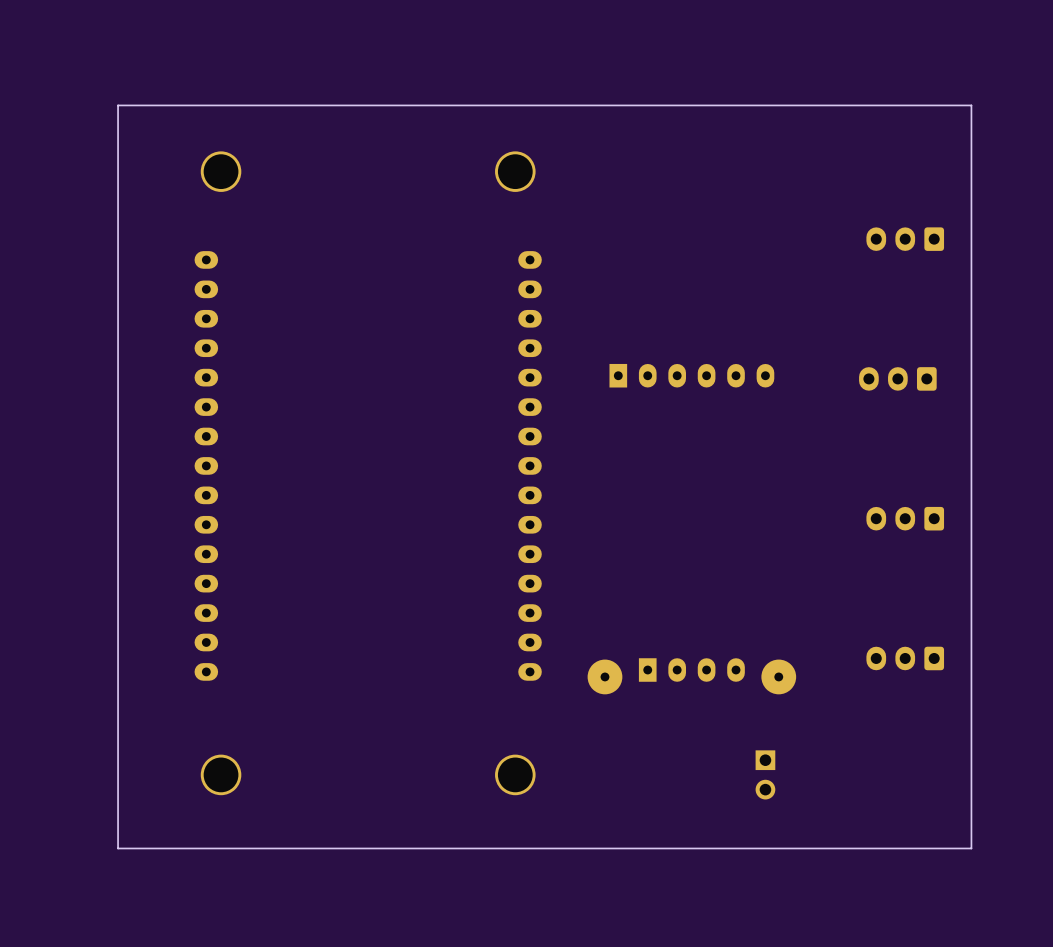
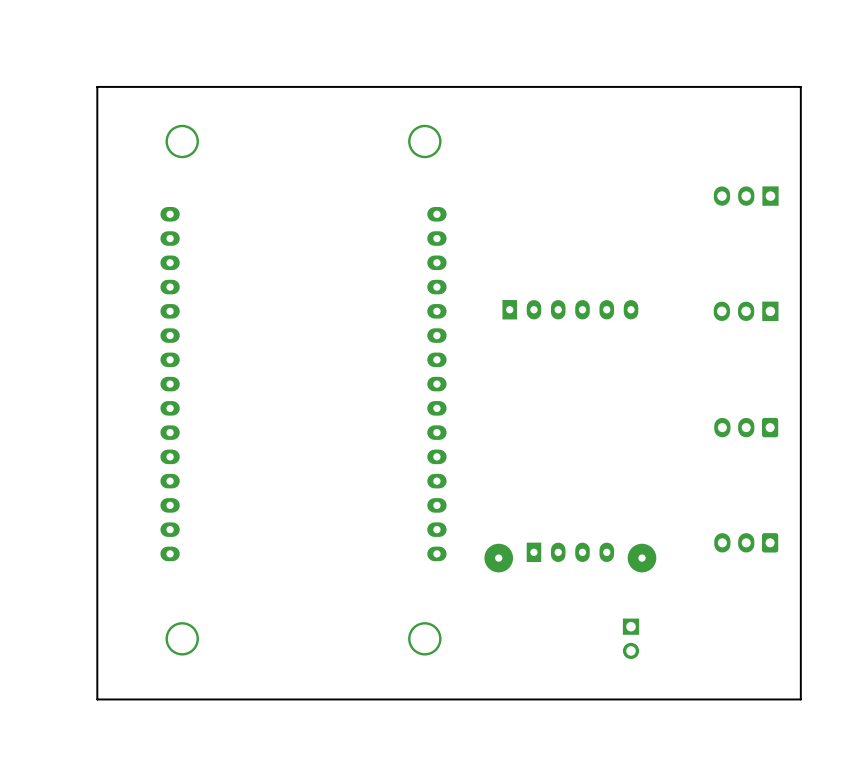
part footprint: [866, 227, 945, 251] -> [713, 186, 779, 206]
part footprint: [859, 367, 937, 391] -> [713, 301, 779, 322]

